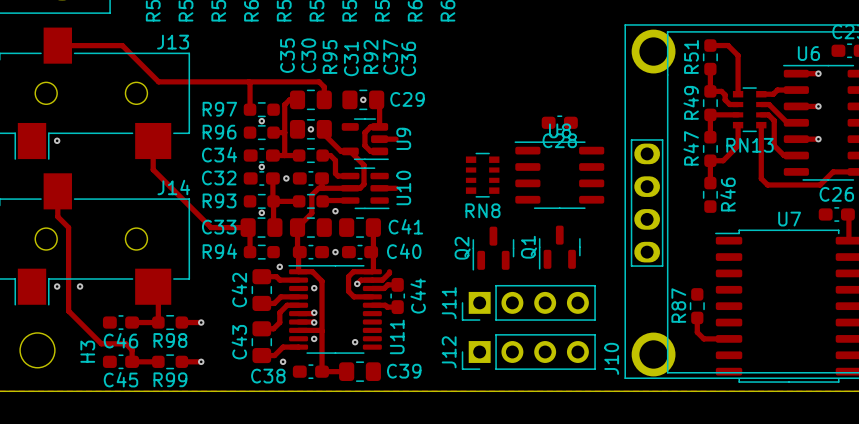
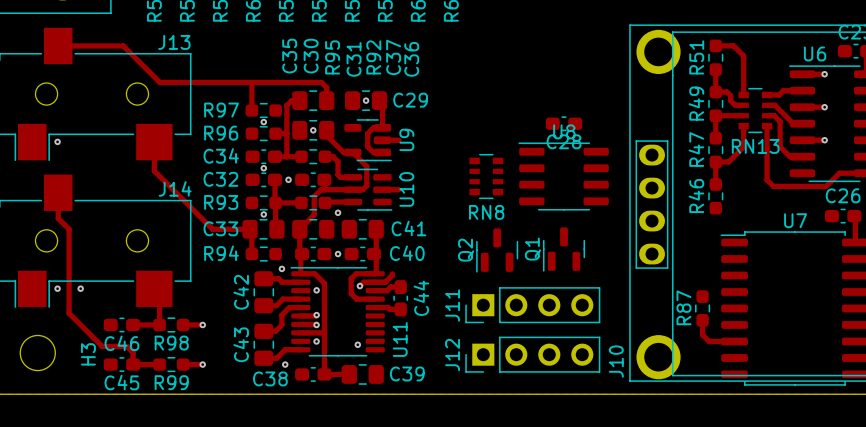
R46 name position: R46 (728, 194) -> R46 (696, 196)

